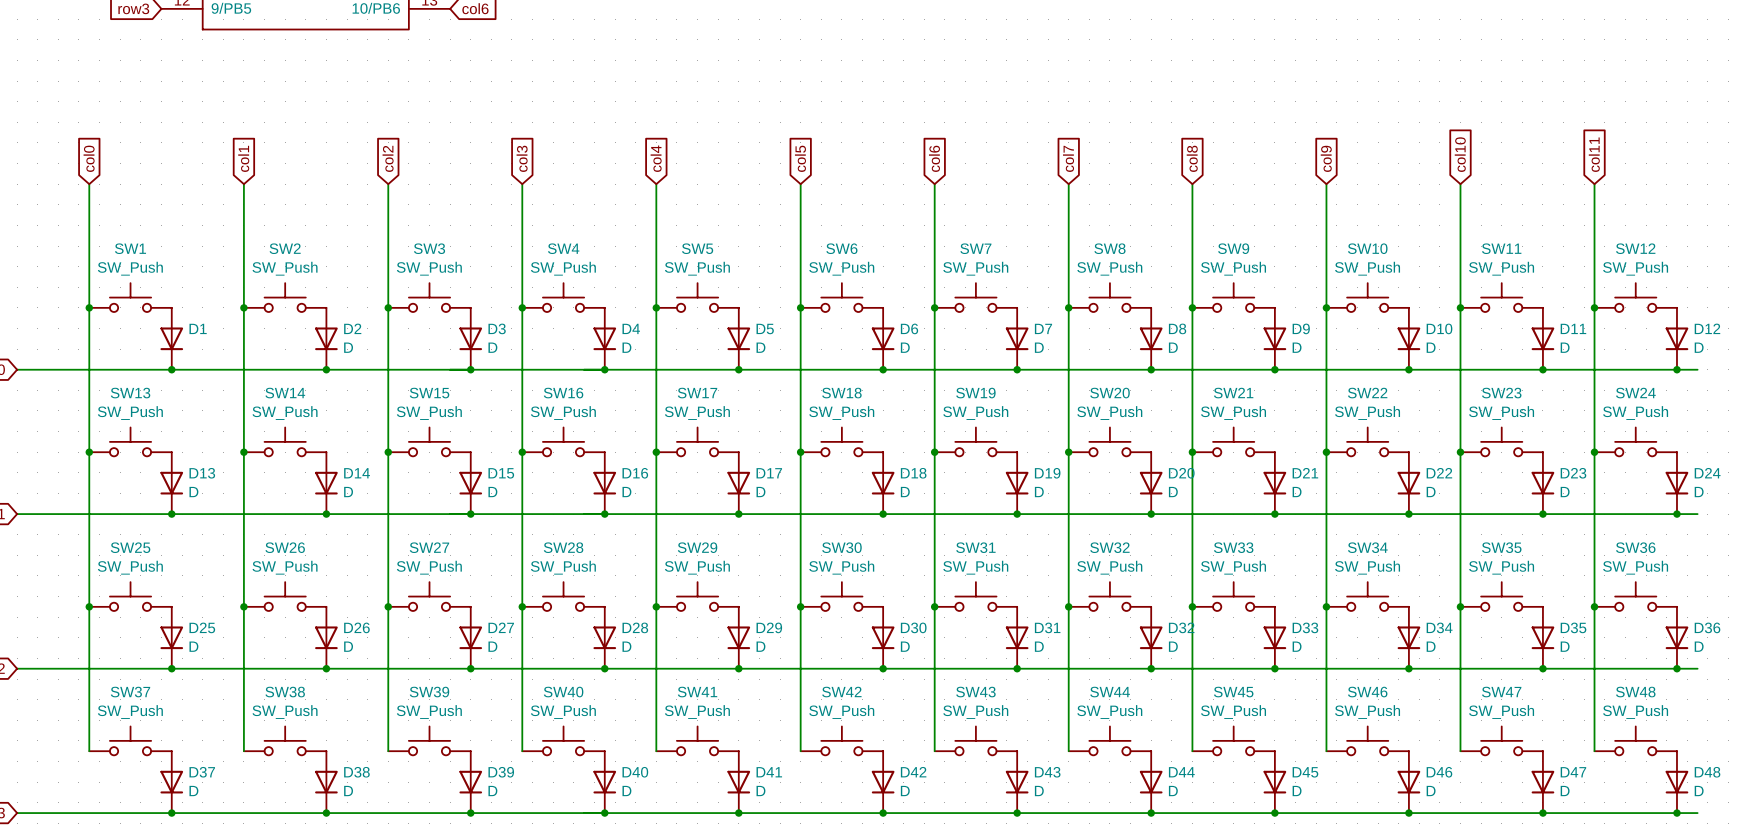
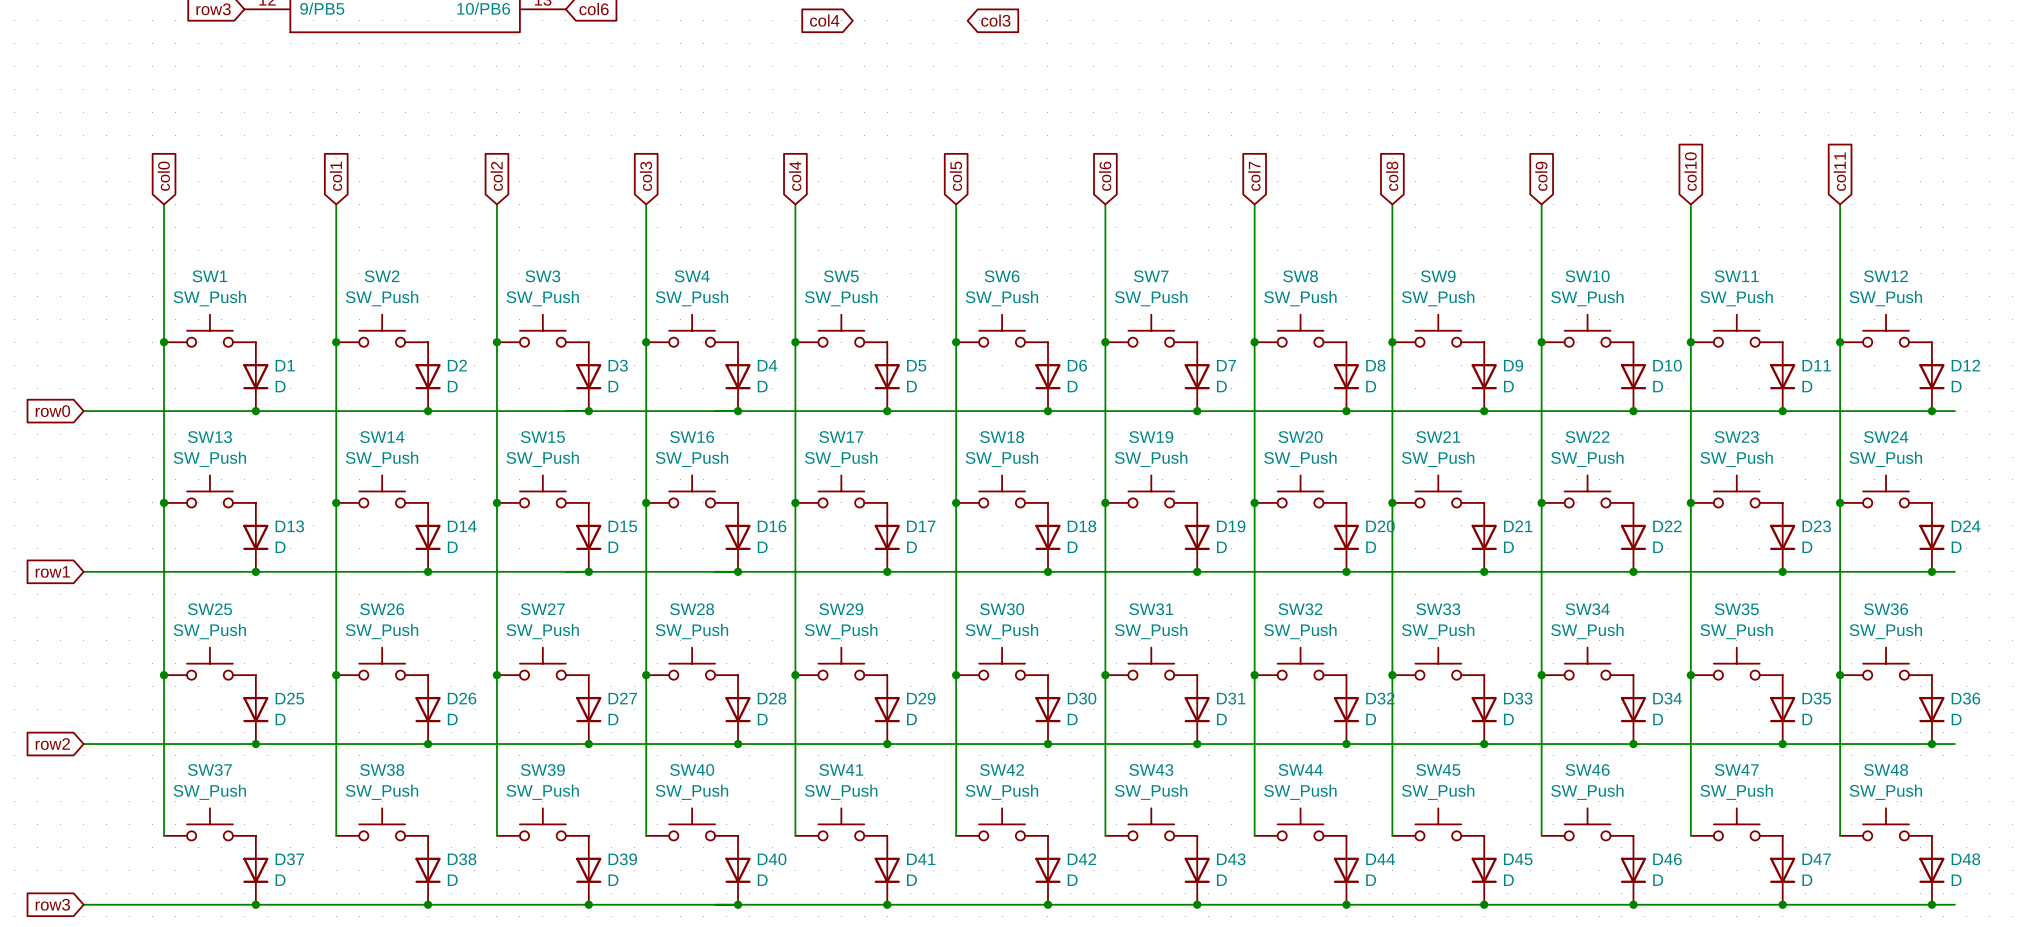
global label: none -> col4 (824, 20)
global label: none -> col3 (995, 20)
D1 value: none -> D (280, 386)

